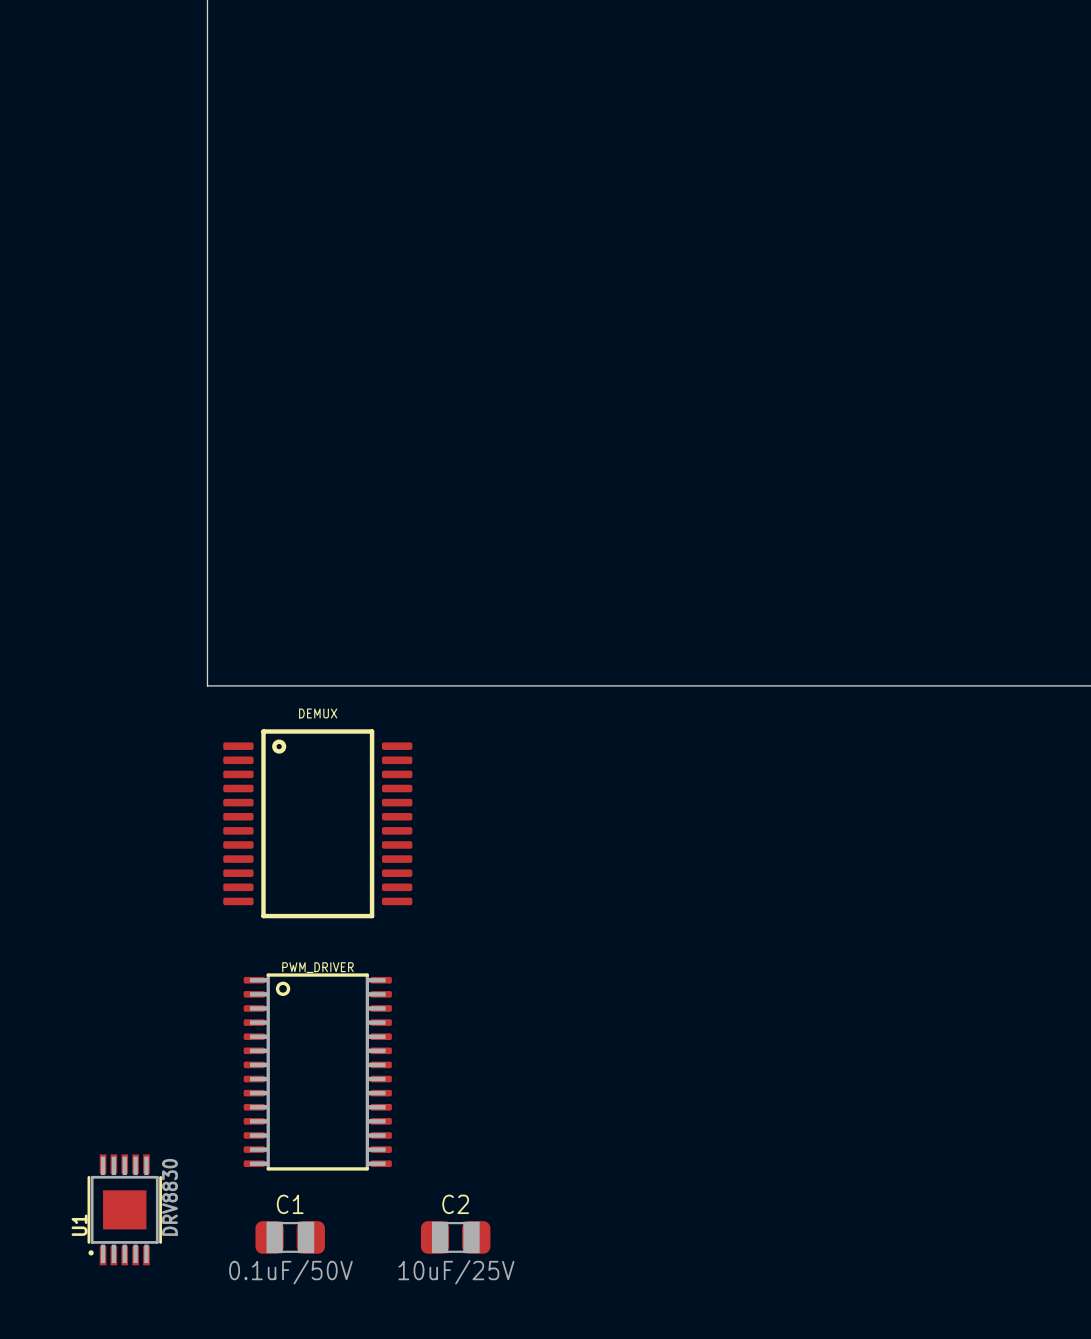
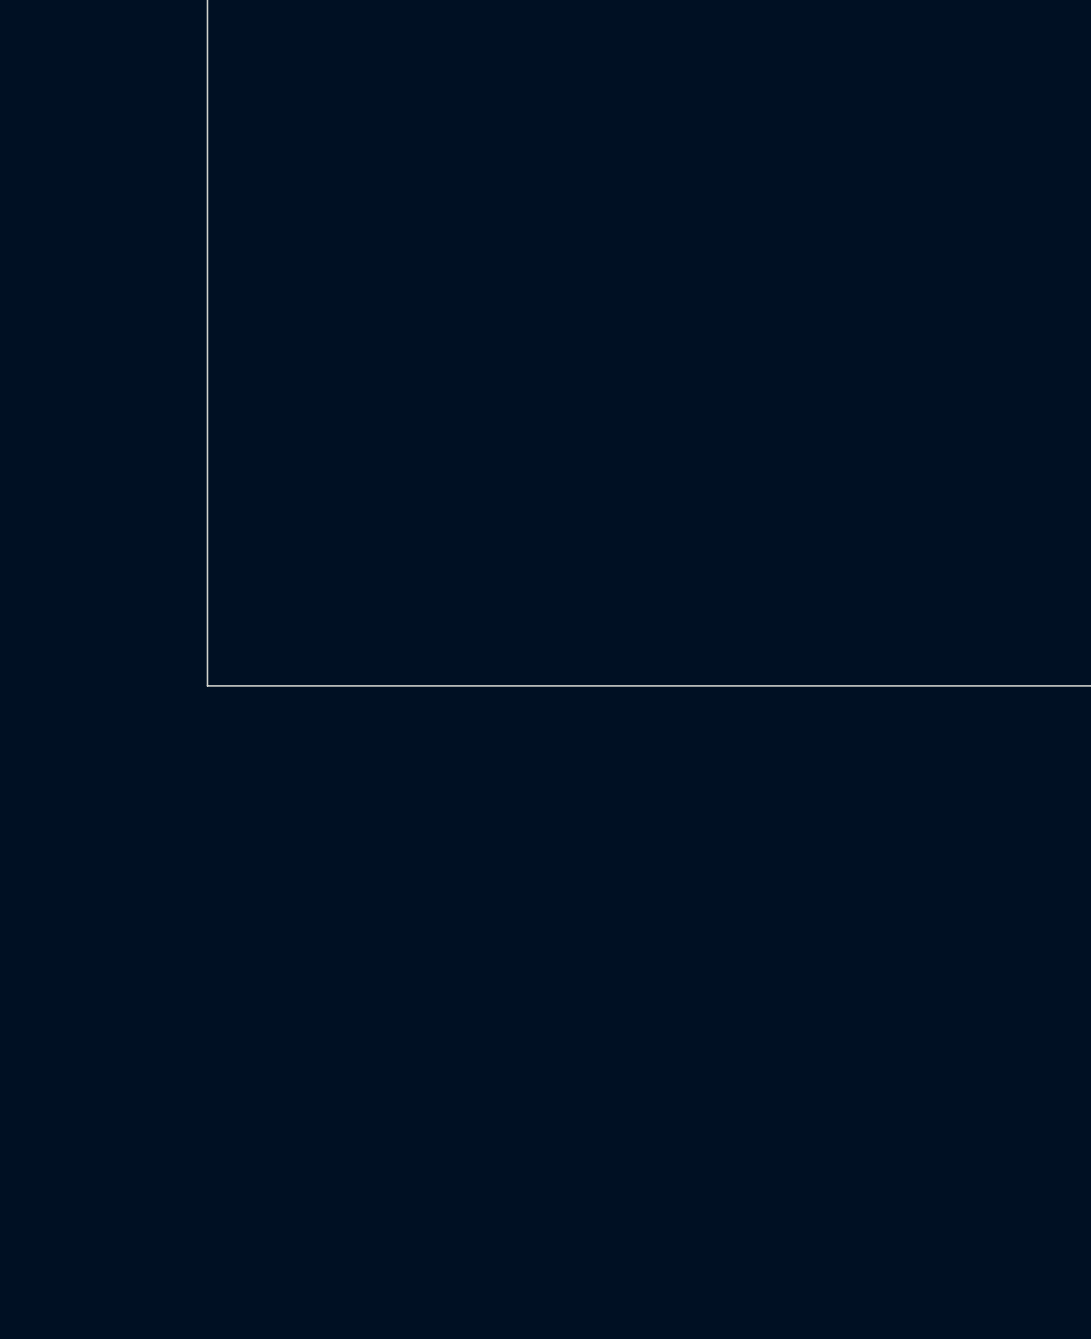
DEMUX: (317, 823) -> none
PWM_DRIVER: (317, 1071) -> none
U1: DRV8830 (124, 1209) -> none
C1: (290, 1237) -> none
C2: (455, 1237) -> none

